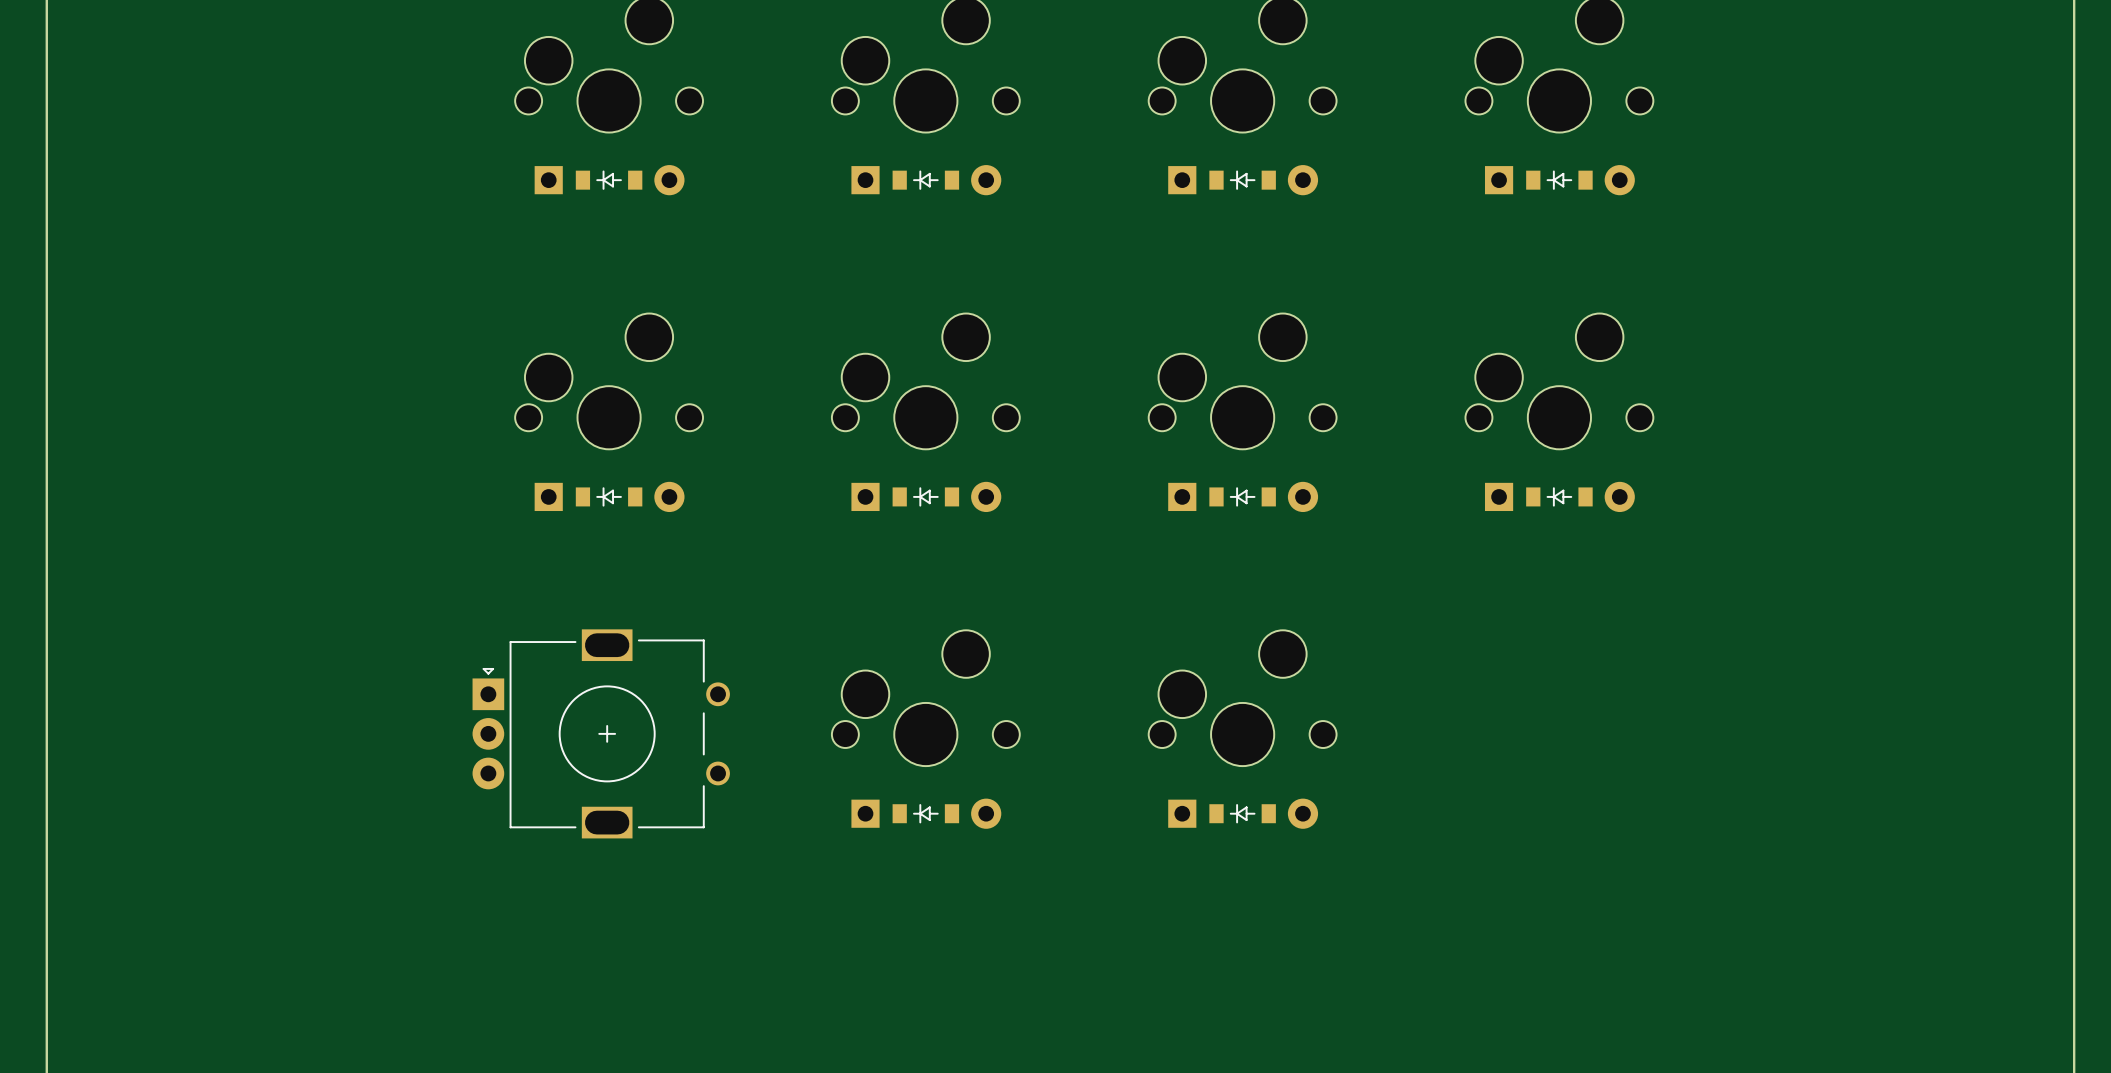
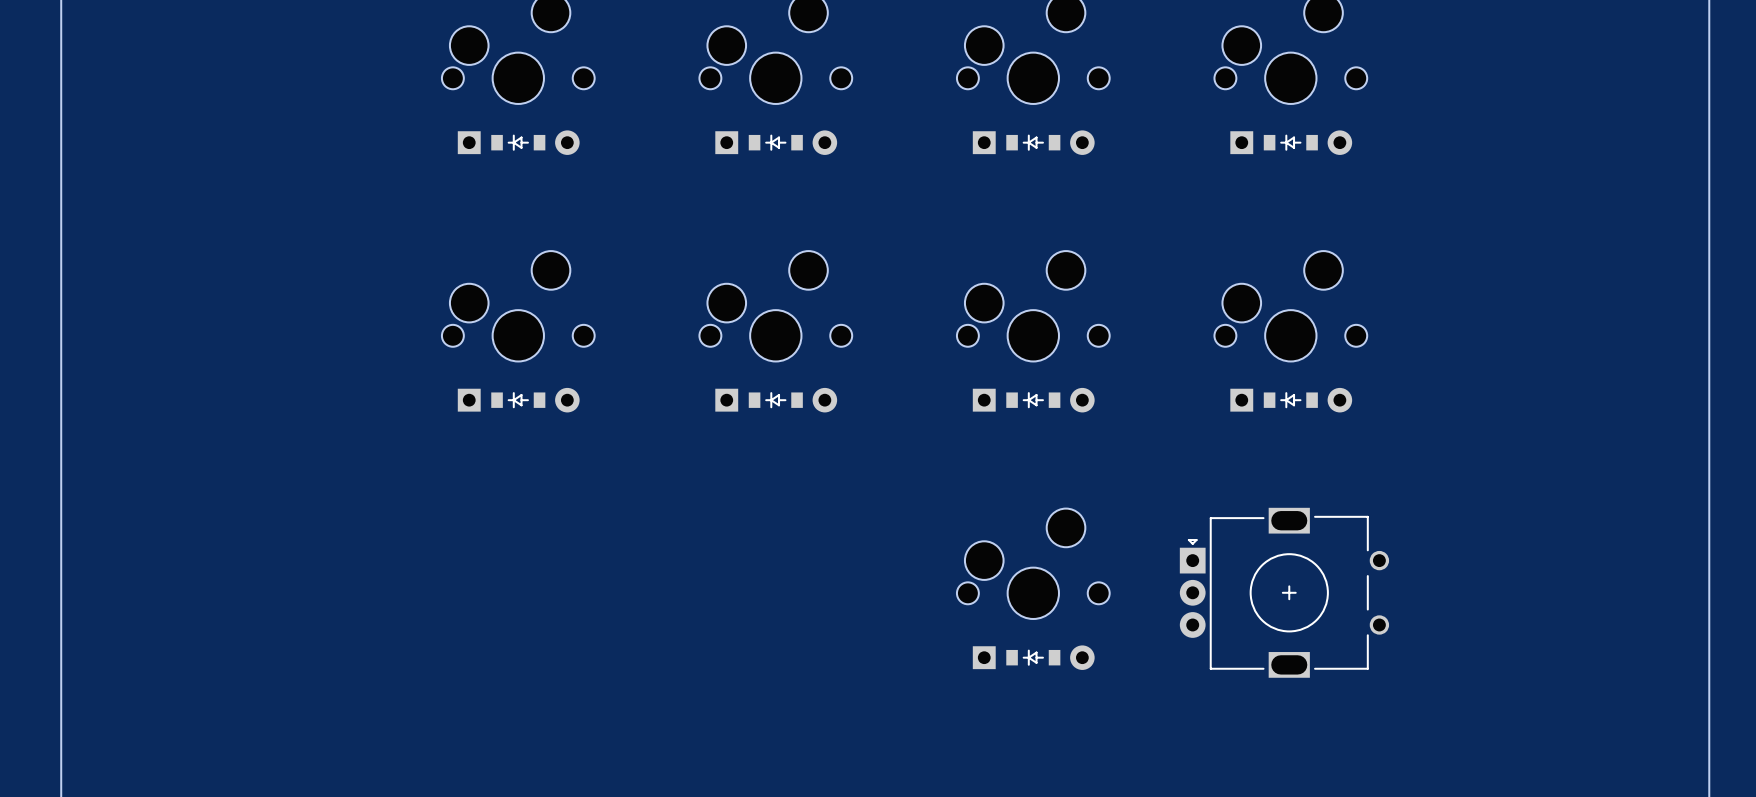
part: (925, 698) -> none
part: (601, 733) -> none
part: none -> (1284, 592)
part: (926, 813) -> none

